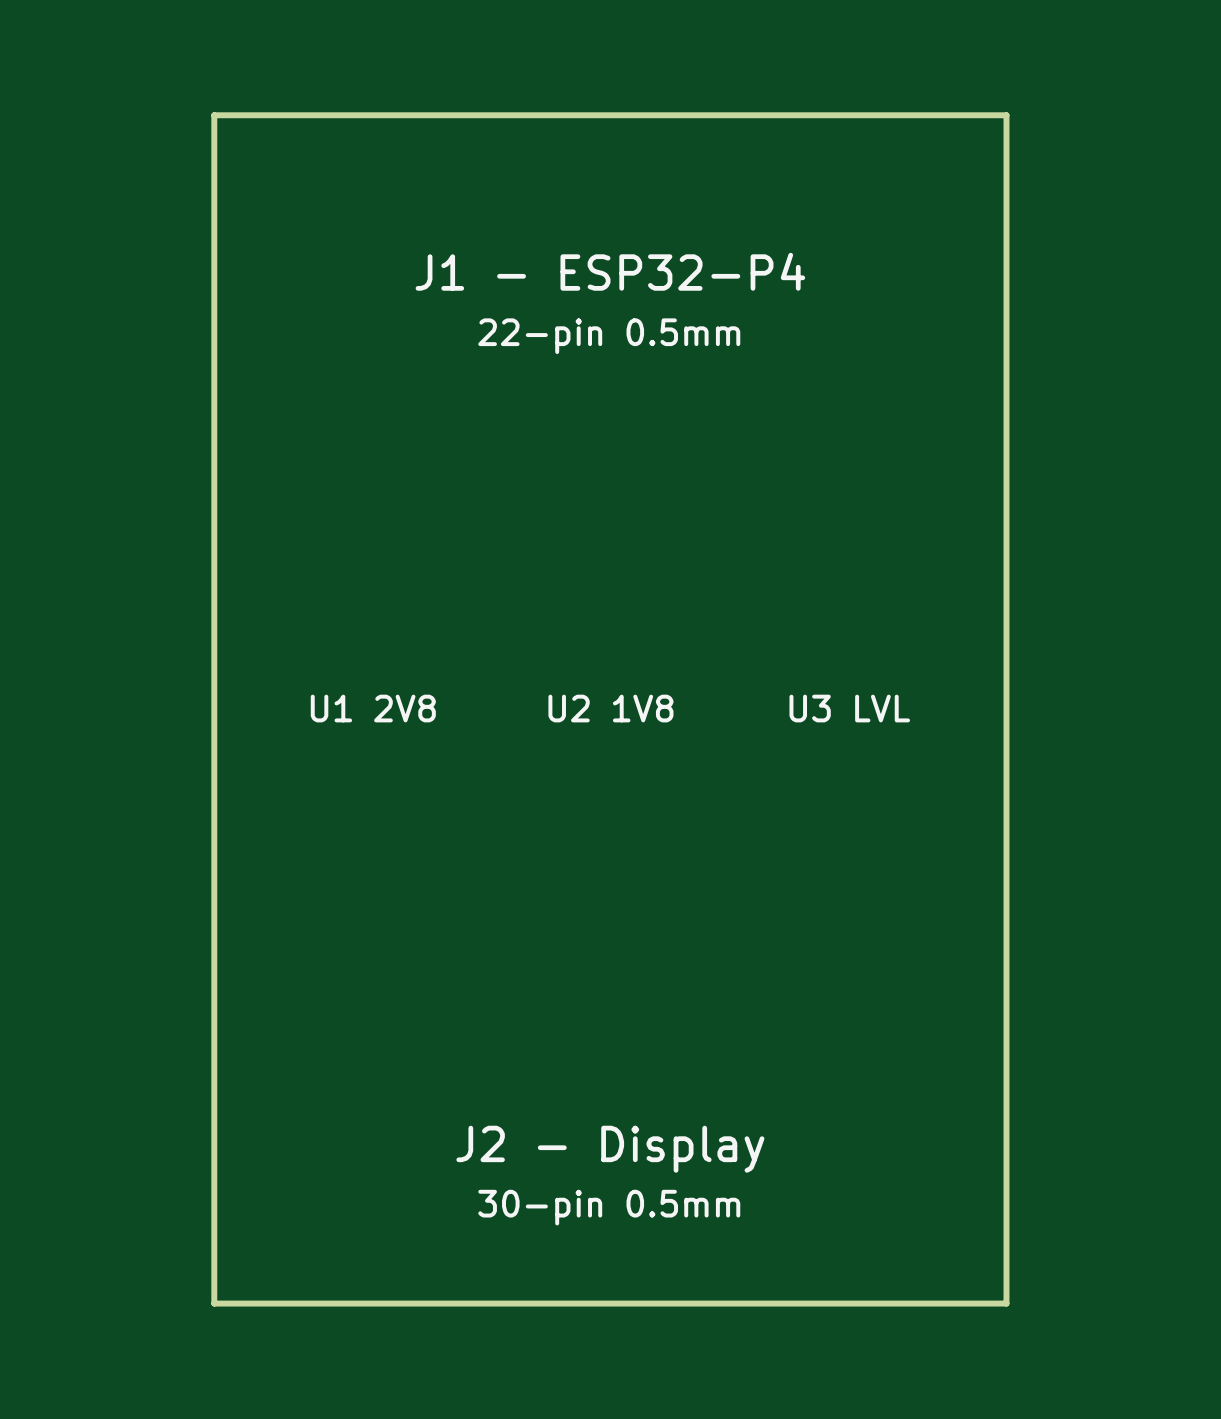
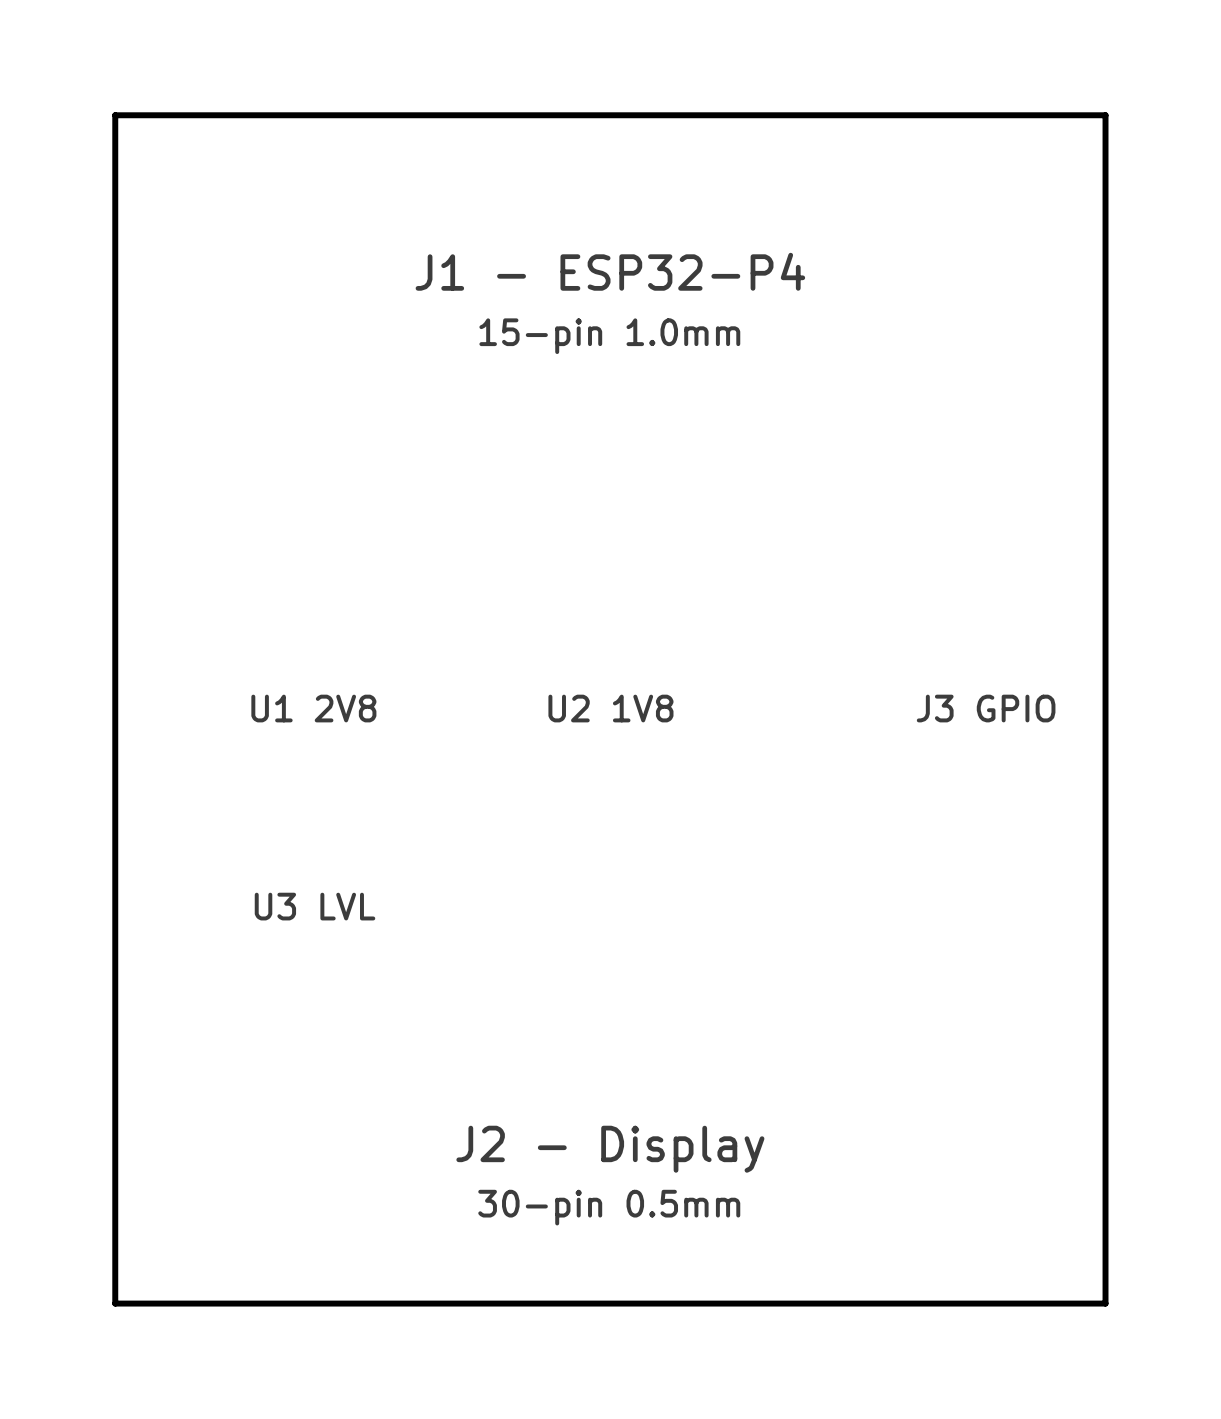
board edge: (214, 115) (214, 1303) -> (214, 115) (115, 115) (115, 1303) (214, 1303)
board edge: (1006, 115) (1006, 1303) -> (1006, 115) (1105, 115) (1105, 1303) (1006, 1303)
text: 22-pin 0.5mm (609, 336) -> 15-pin 1.0mm (609, 336)
text position: U1 2V8 (373, 708) -> U1 2V8 (313, 708)
text position: U3 LVL (849, 708) -> U3 LVL (315, 906)
text: none -> J3 GPIO (986, 708)

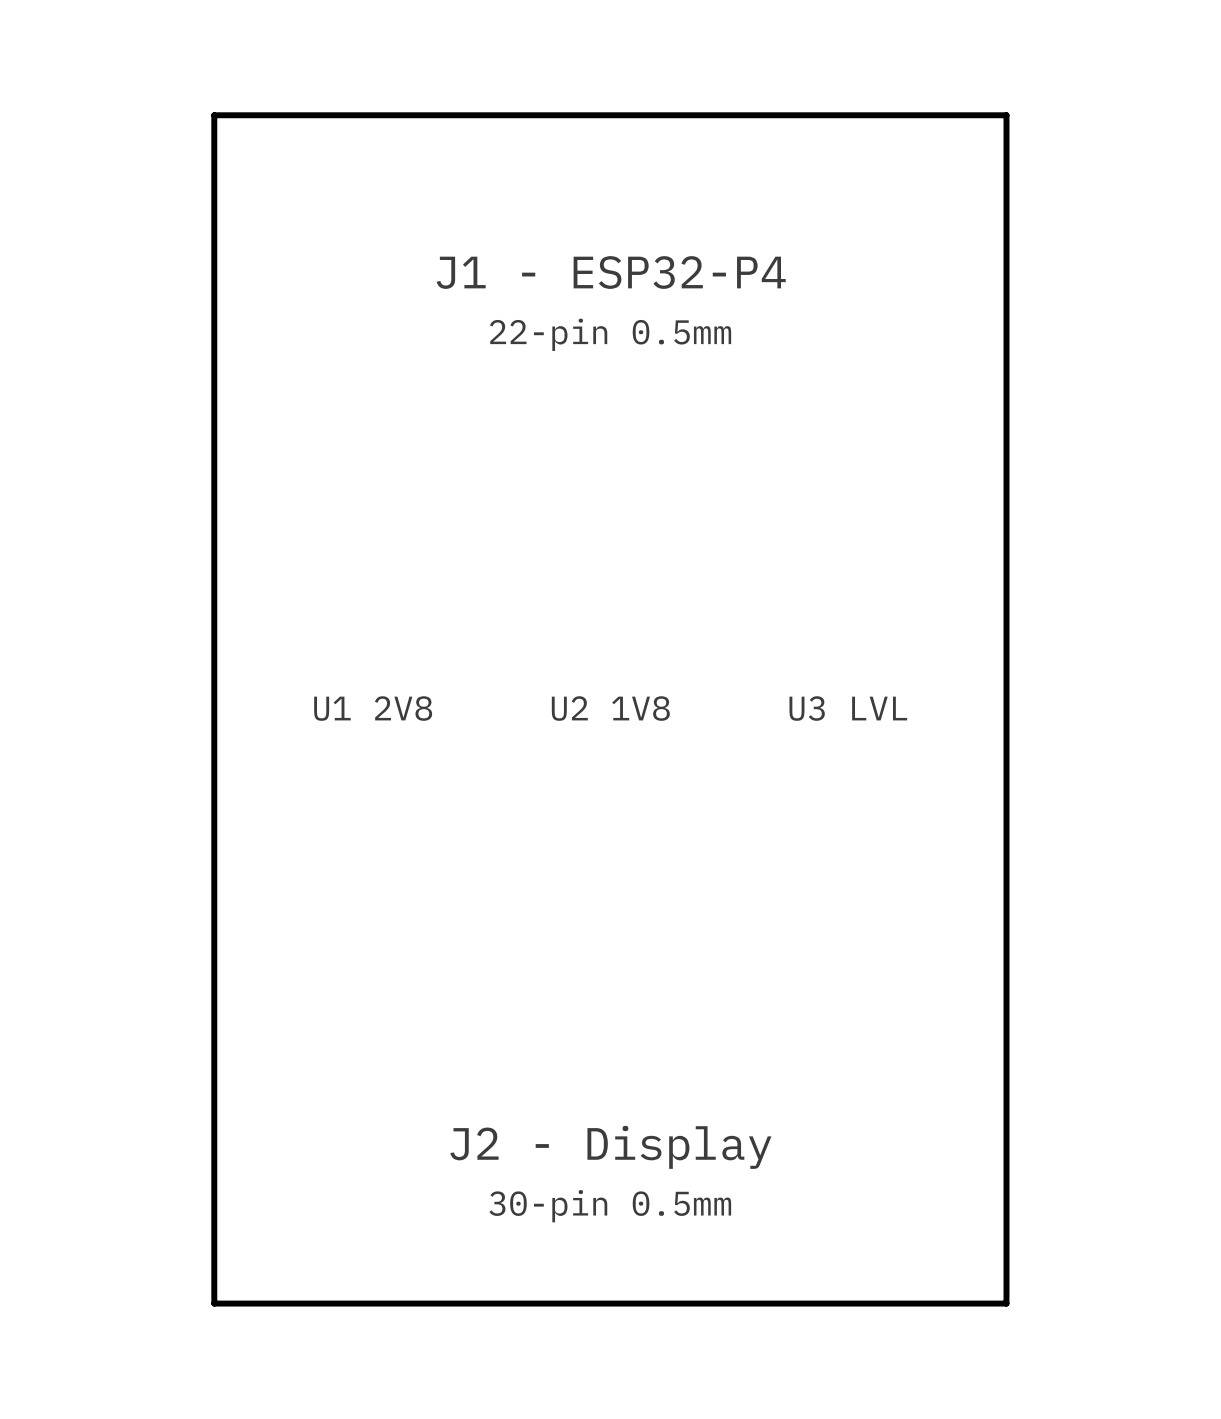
board edge: (214, 115) (115, 115) (115, 1303) (214, 1303) -> (214, 115) (214, 1303)
board edge: (1006, 115) (1105, 115) (1105, 1303) (1006, 1303) -> (1006, 115) (1006, 1303)
text: 15-pin 1.0mm (609, 336) -> 22-pin 0.5mm (610, 334)
text position: U1 2V8 (313, 708) -> U1 2V8 (373, 708)
text: J3 GPIO (986, 708) -> none
text position: U3 LVL (315, 906) -> U3 LVL (848, 708)

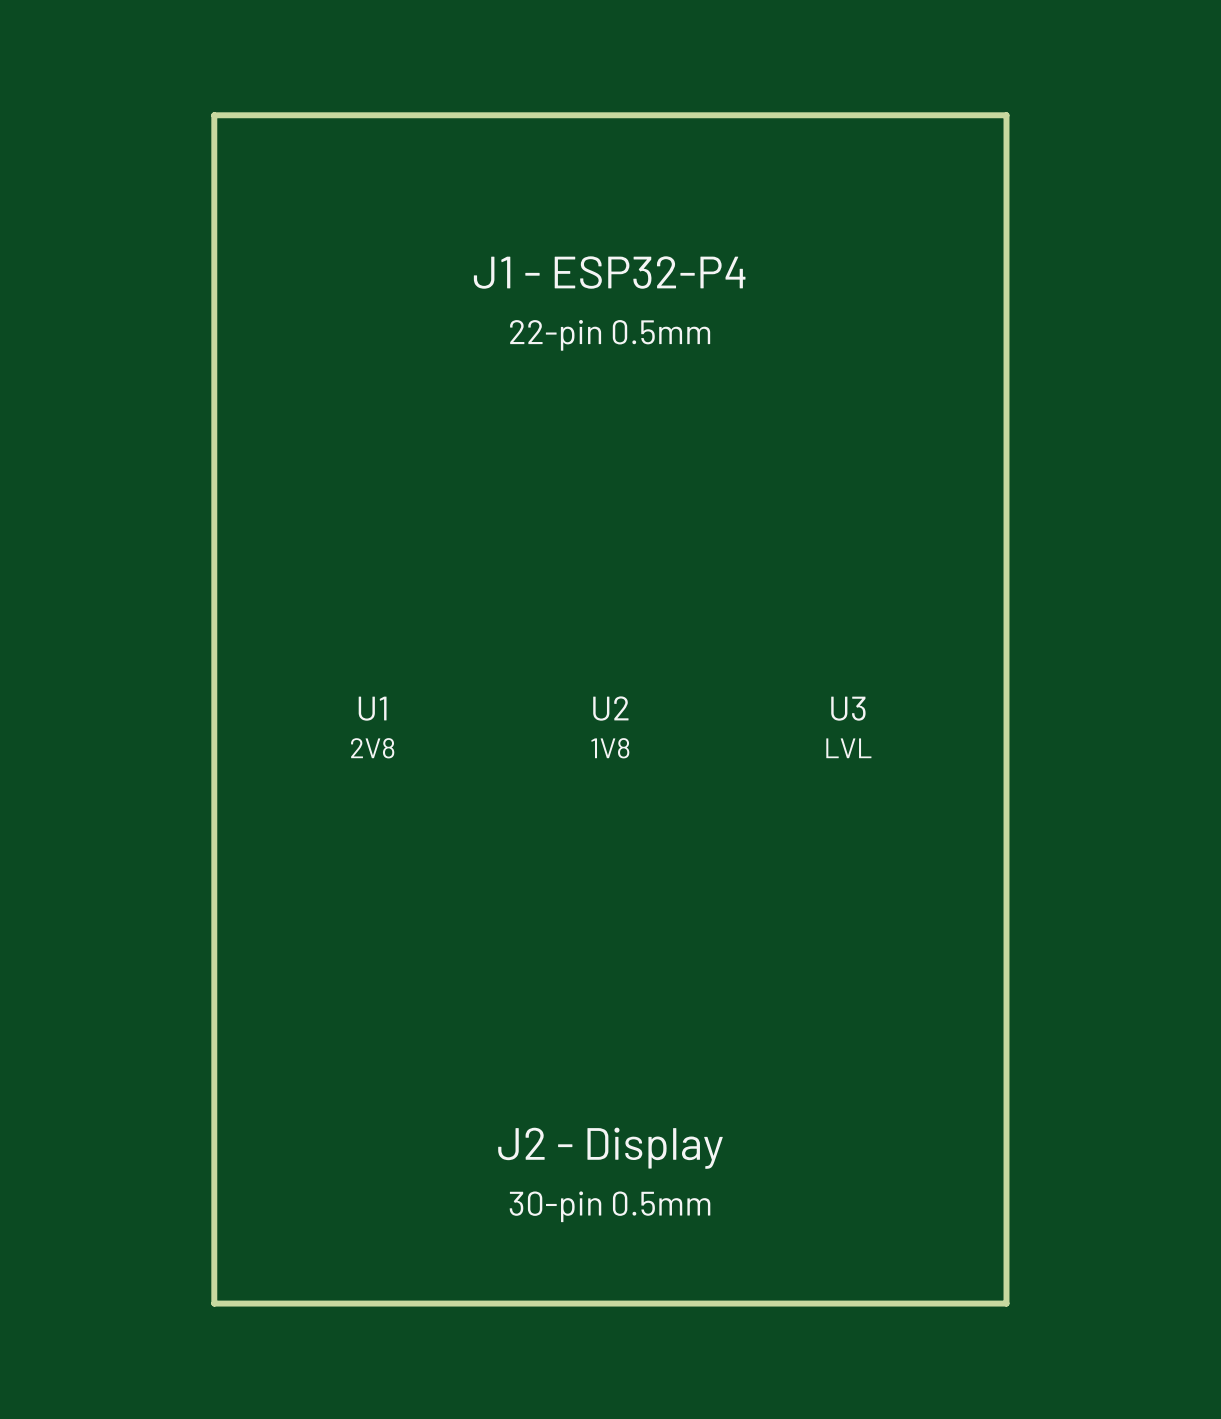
text: U1 2V8 (373, 708) -> U1 (372, 708)
text: U2 1V8 (610, 708) -> U2 (610, 708)
text: U3 LVL (848, 708) -> U3 (848, 708)
text: none -> 2V8 (372, 748)
text: none -> 1V8 (610, 748)
text: none -> LVL (848, 748)

